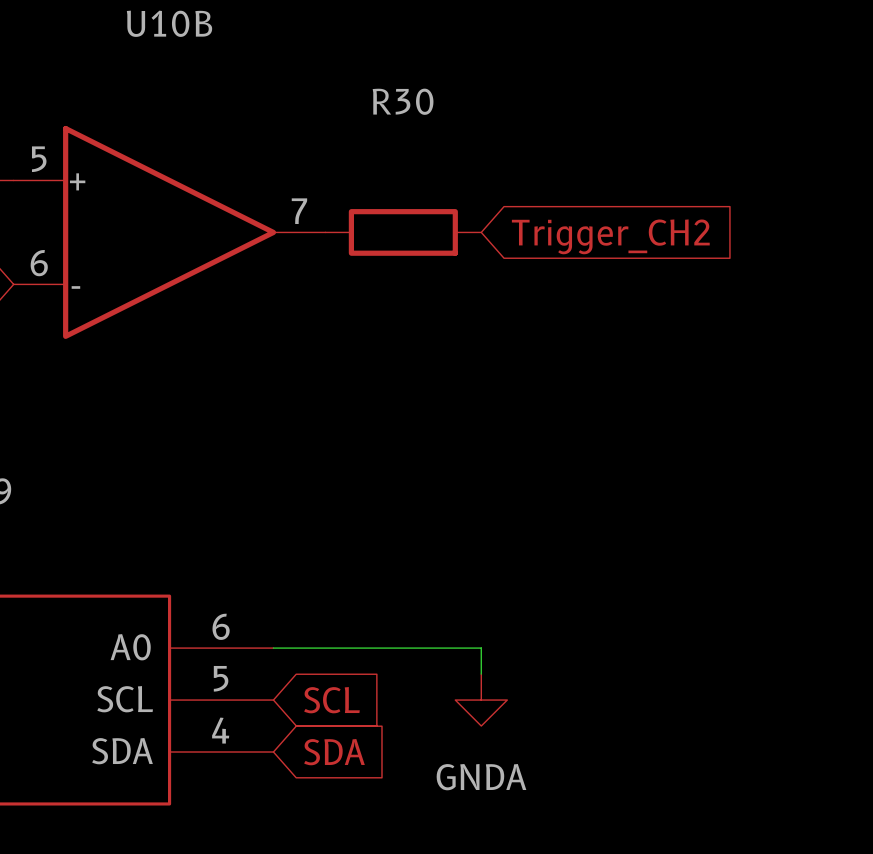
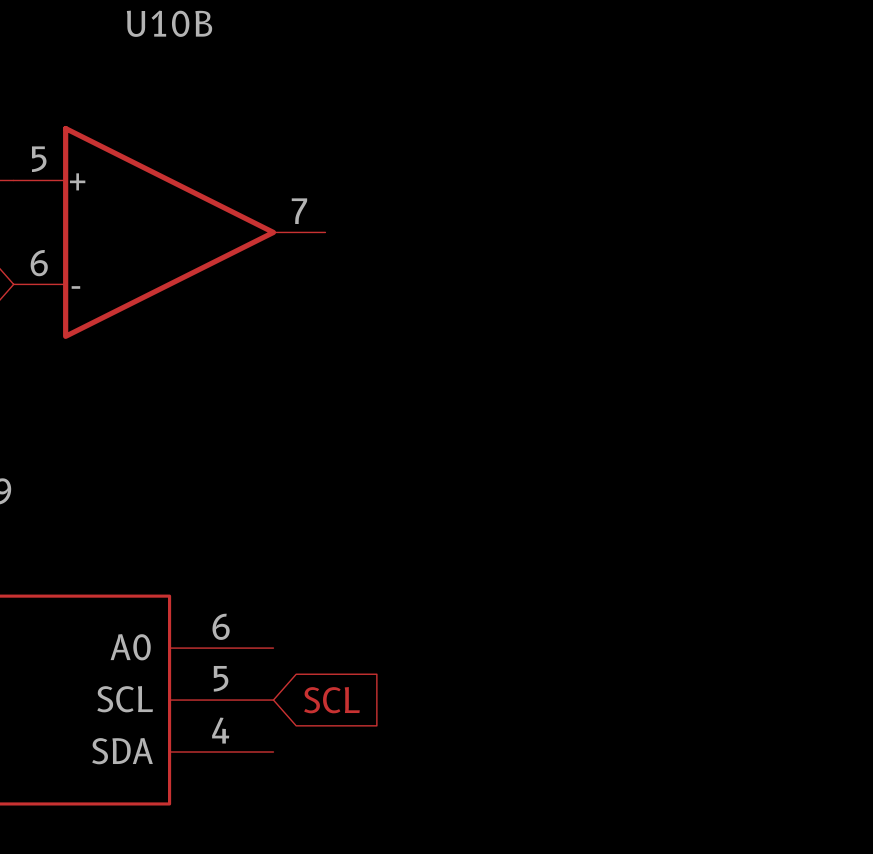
R30: (403, 232) -> none
global label: Trigger_CH2 (610, 236) -> none
wire: (273, 648) (481, 648) (481, 674) -> none
power symbol: GNDA (481, 700) -> none
global label: SDA (334, 752) -> none

